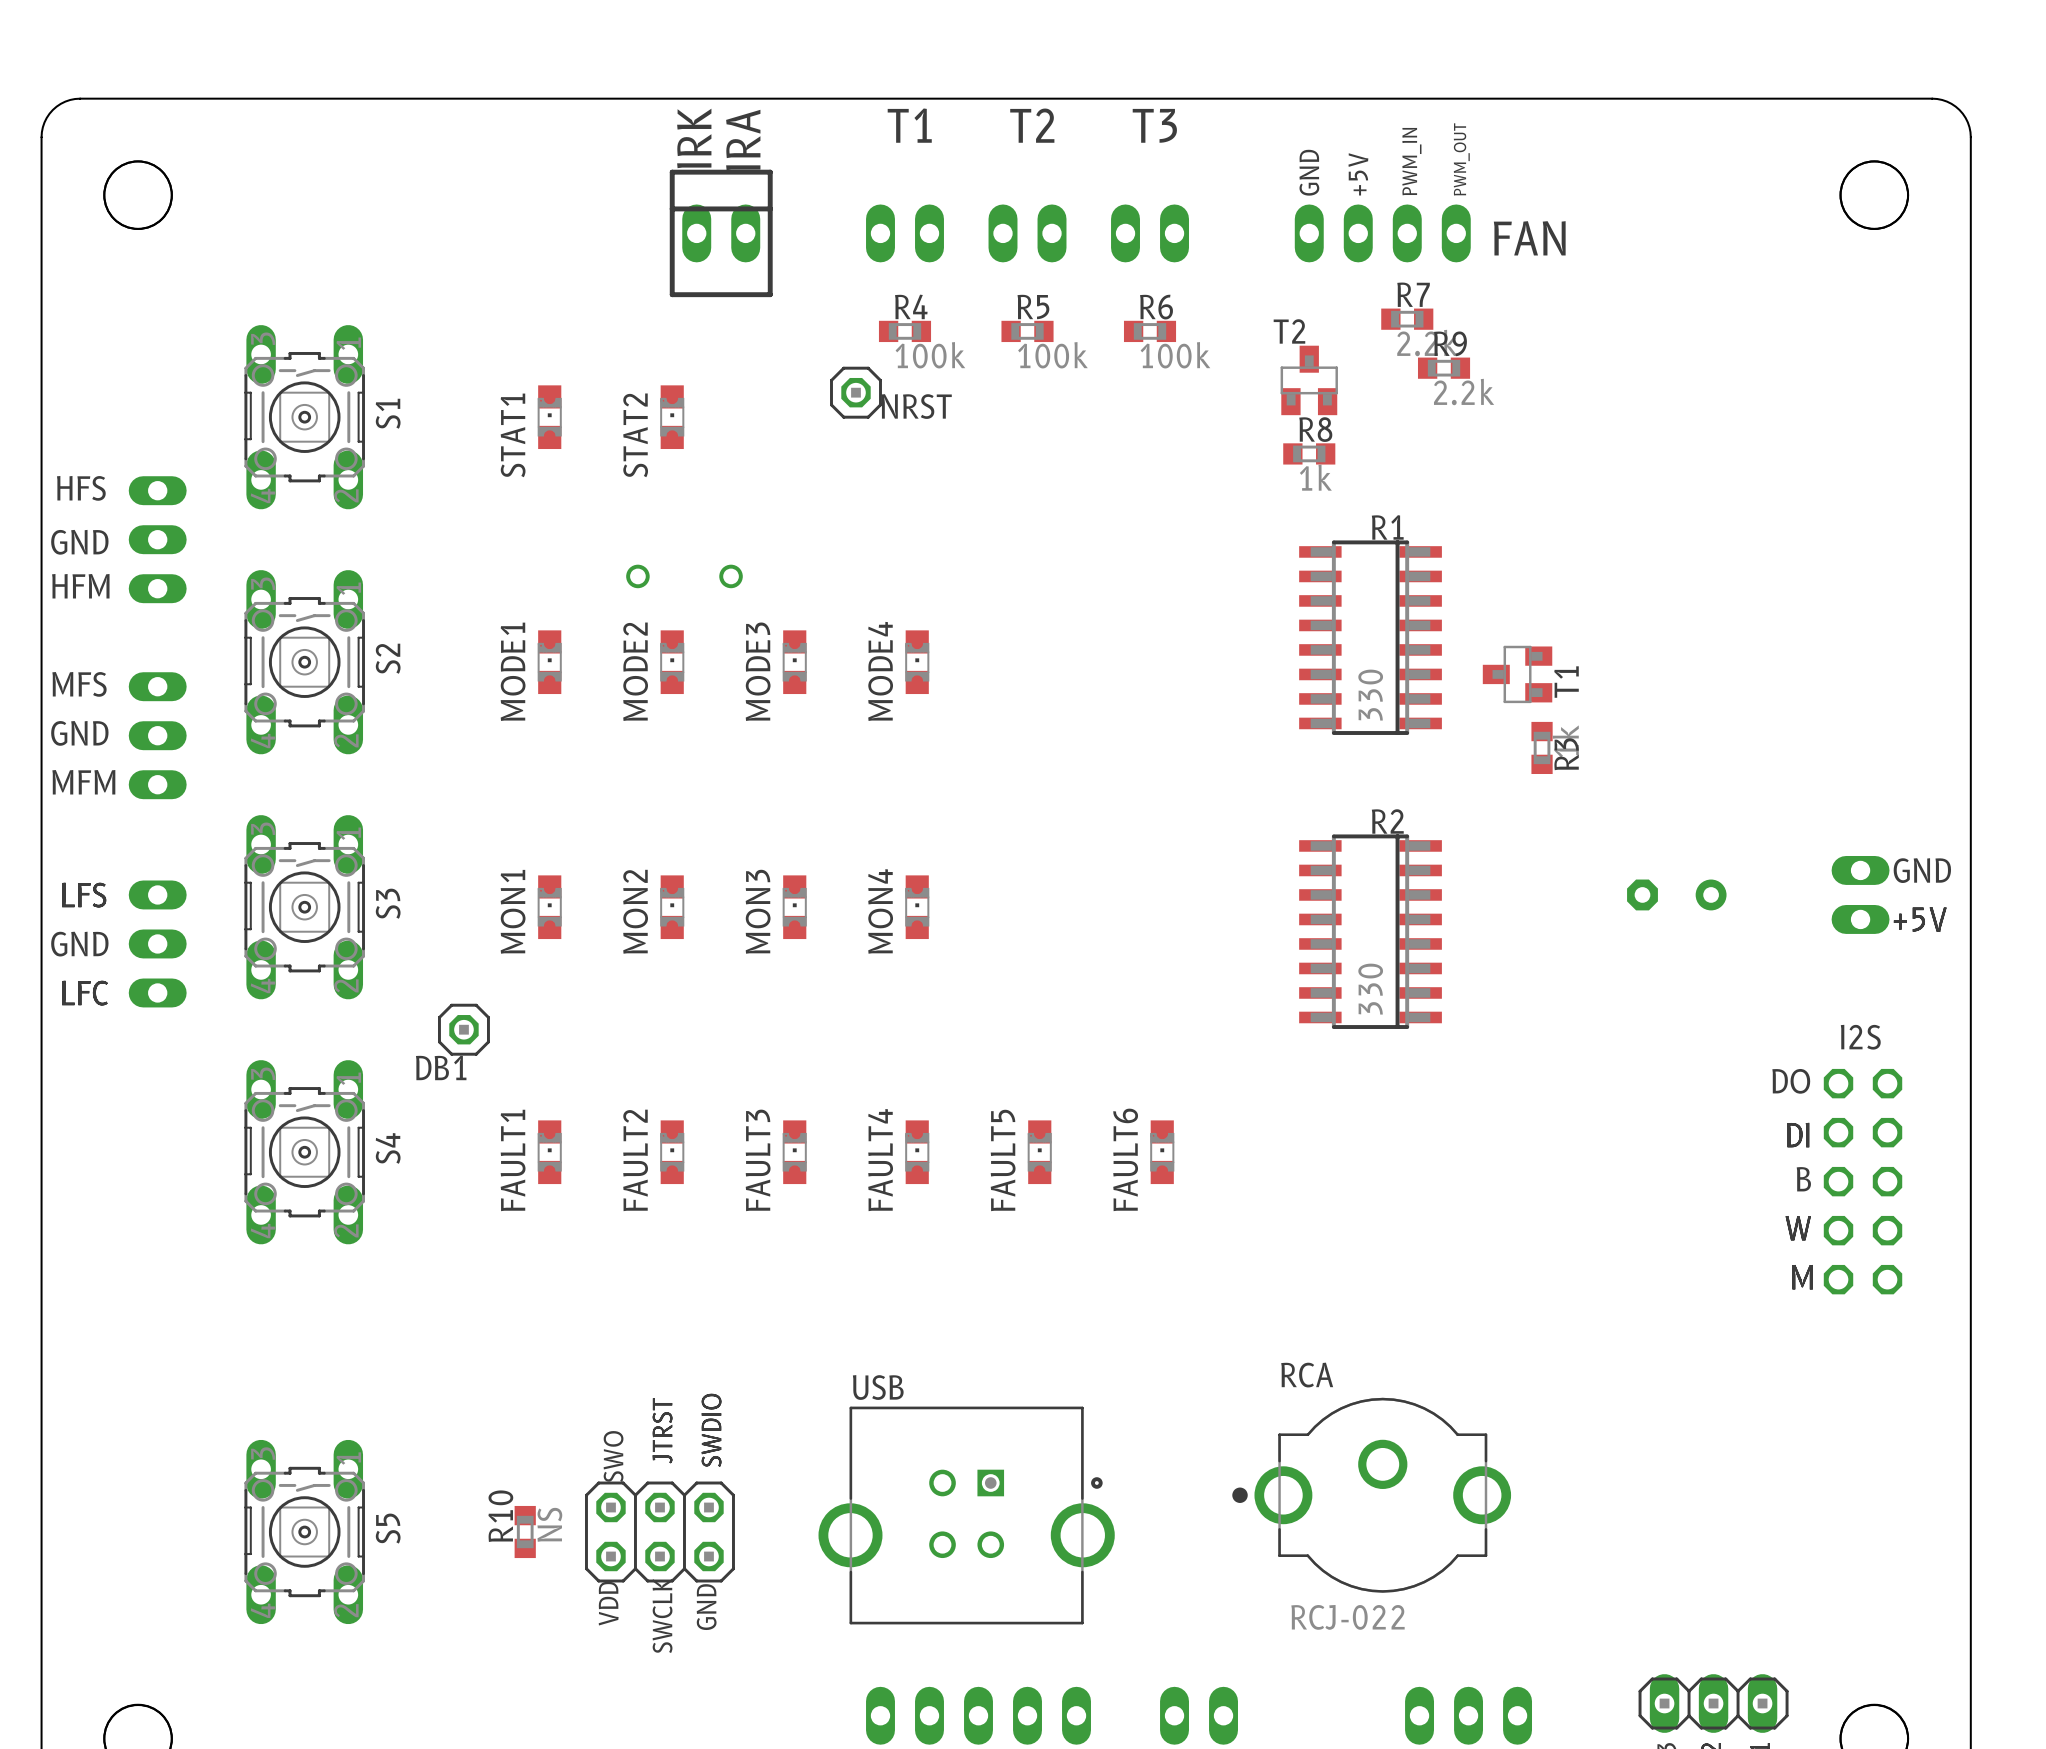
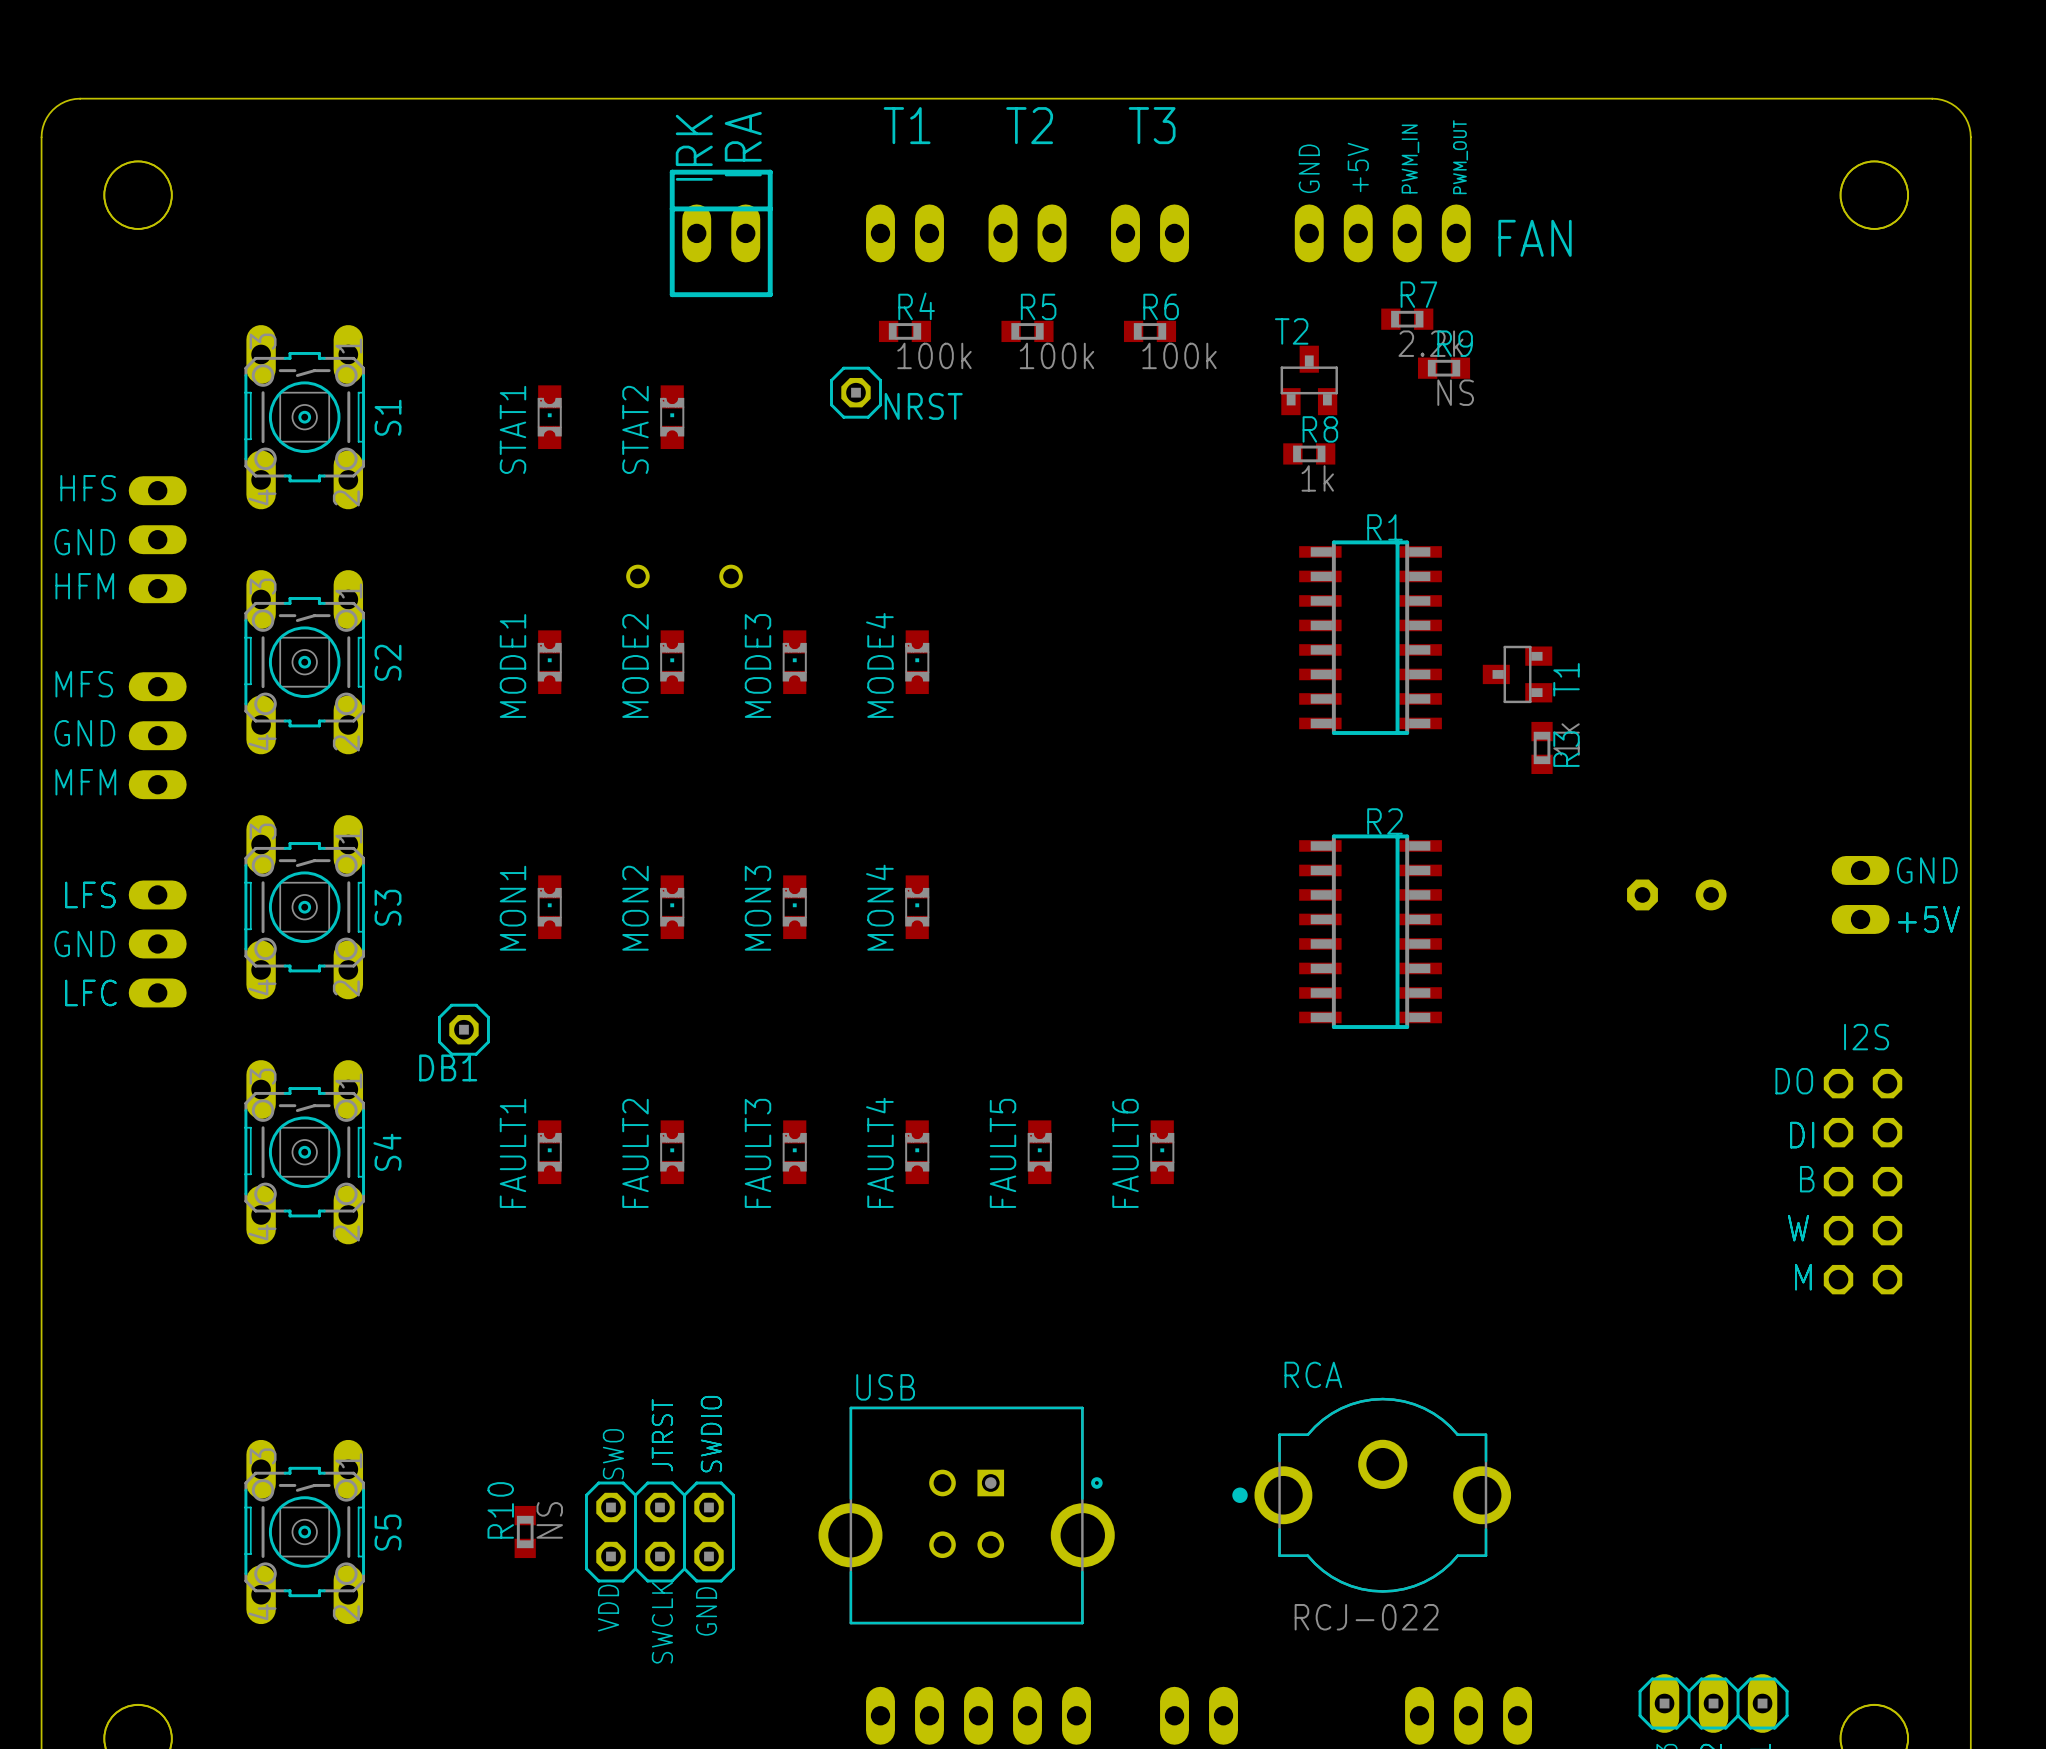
R9 value: 2.2k (1464, 392) -> NS (1455, 392)
R1 value: 330 (1370, 695) -> none
R2 value: 330 (1370, 989) -> none

